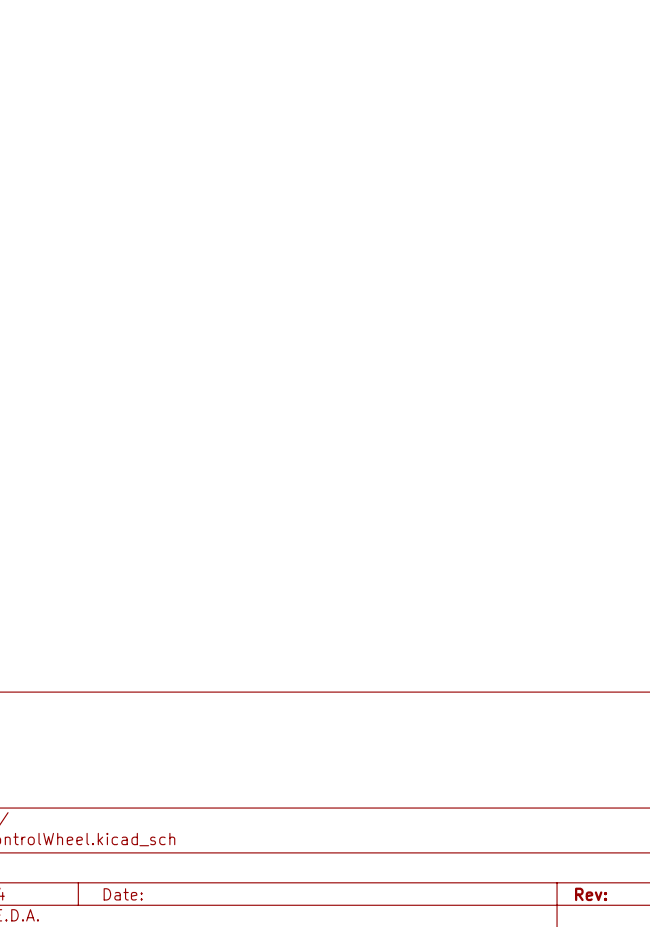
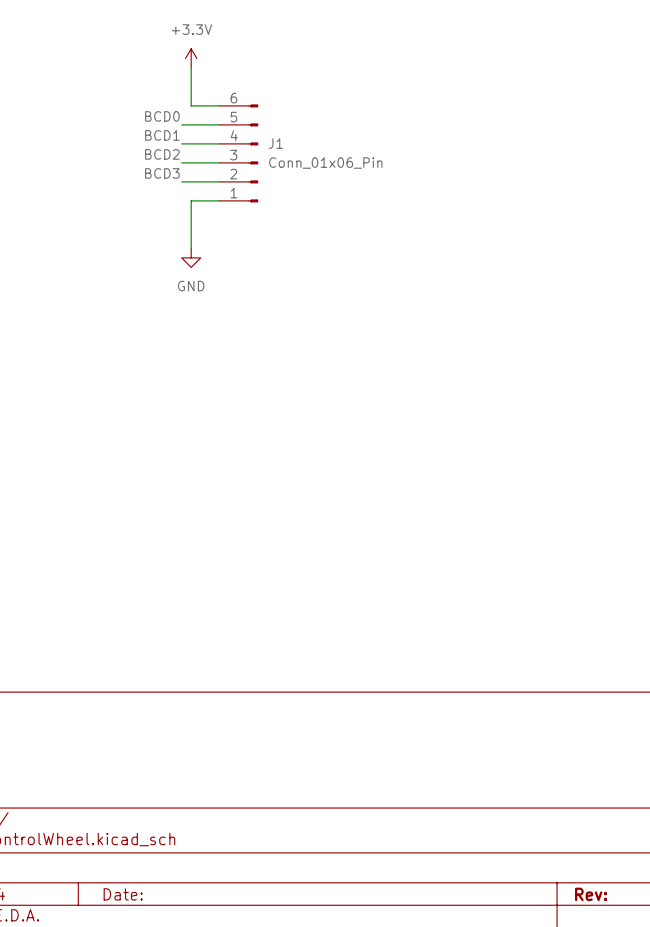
power symbol: none -> +3.3V (191, 58)
wire: none -> (191, 67) (191, 105) (219, 105)
label: none -> BCD0 (162, 116)
wire: none -> (181, 124) (219, 124)
label: none -> BCD1 (162, 135)
wire: none -> (181, 143) (219, 143)
J1: none -> Conn_01x06_Pin (238, 153)
label: none -> BCD2 (162, 154)
wire: none -> (181, 162) (219, 162)
label: none -> BCD3 (162, 173)
wire: none -> (181, 181) (219, 181)
wire: none -> (219, 200) (191, 200) (191, 248)
power symbol: none -> GND (191, 257)

